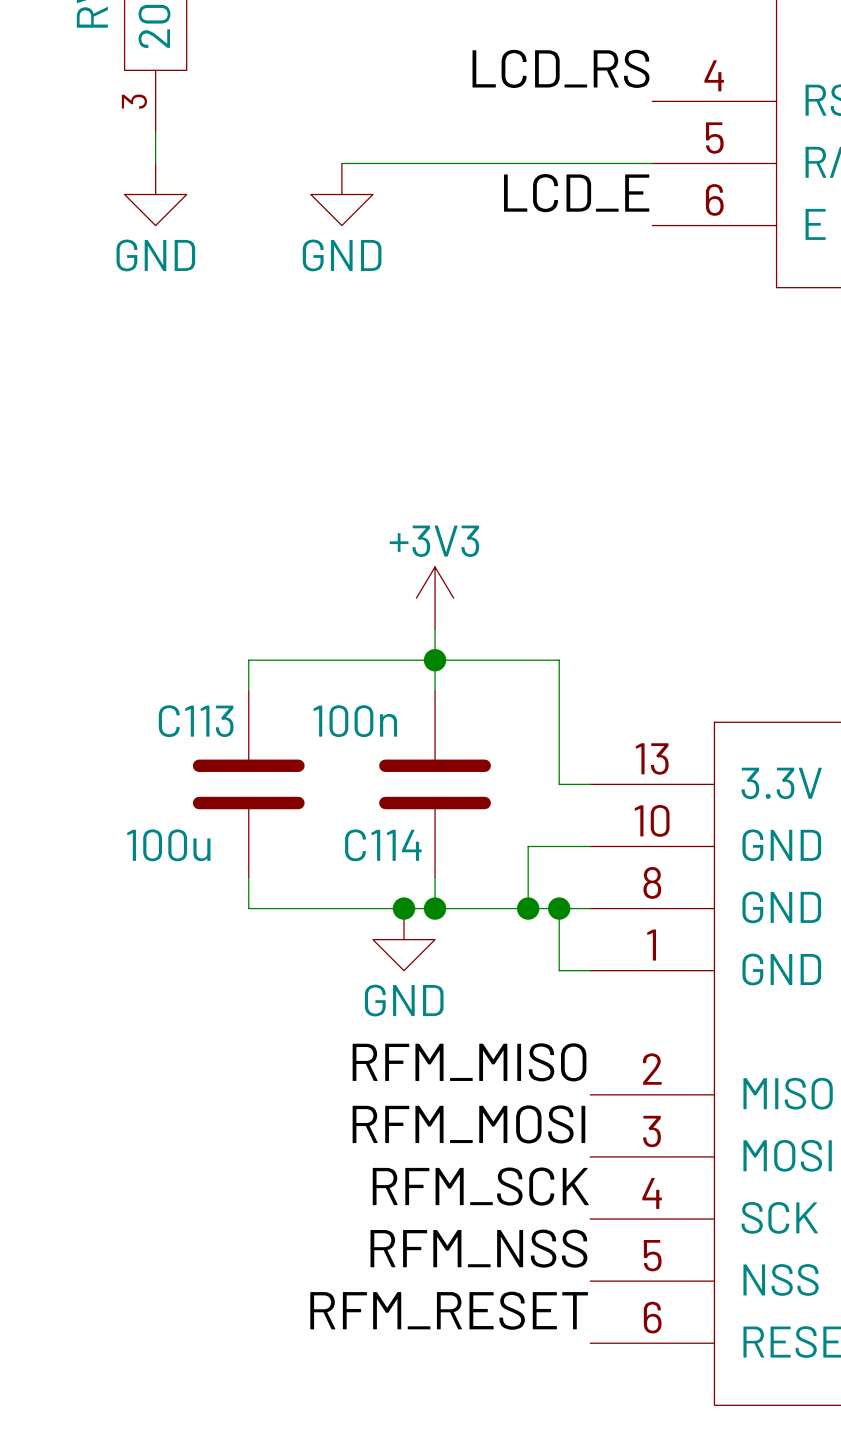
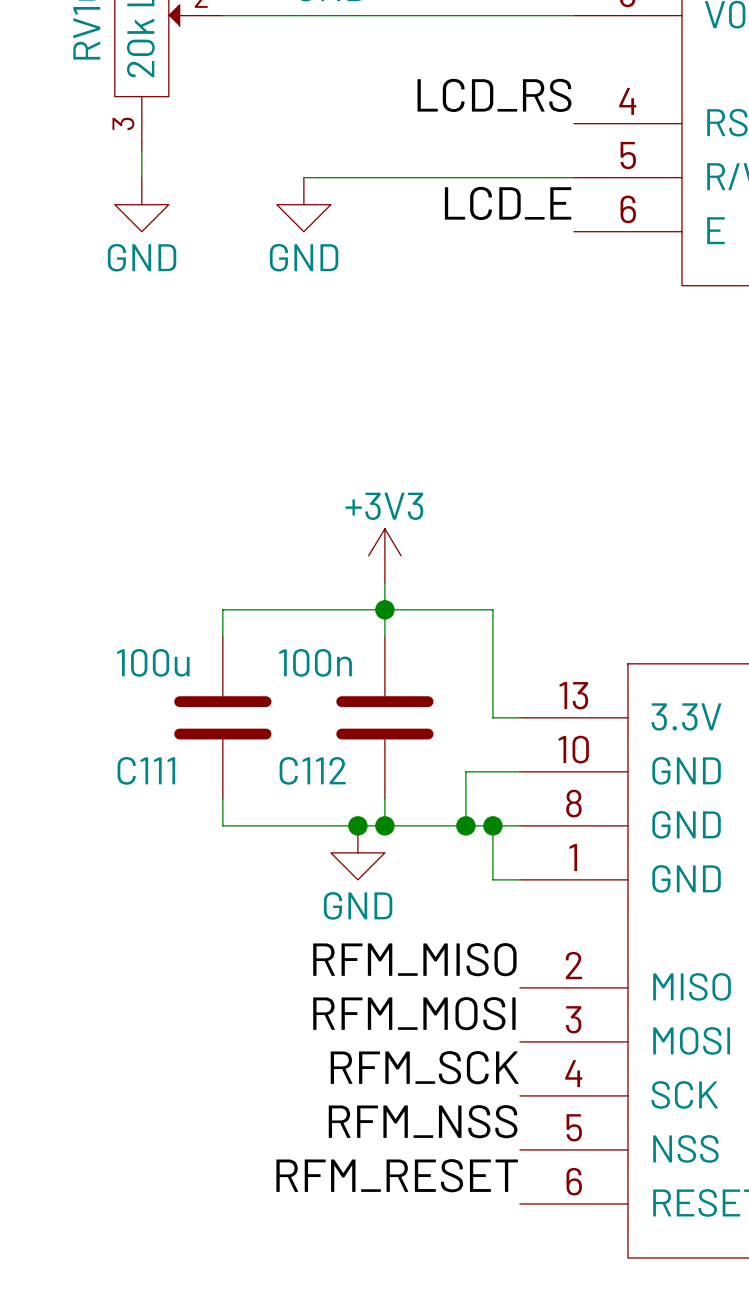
C113 name: C113 (196, 721) -> C111 (146, 770)
C113 value position: 100u (168, 845) -> 100u (153, 662)
C114 name: C114 (383, 845) -> C112 (312, 770)

